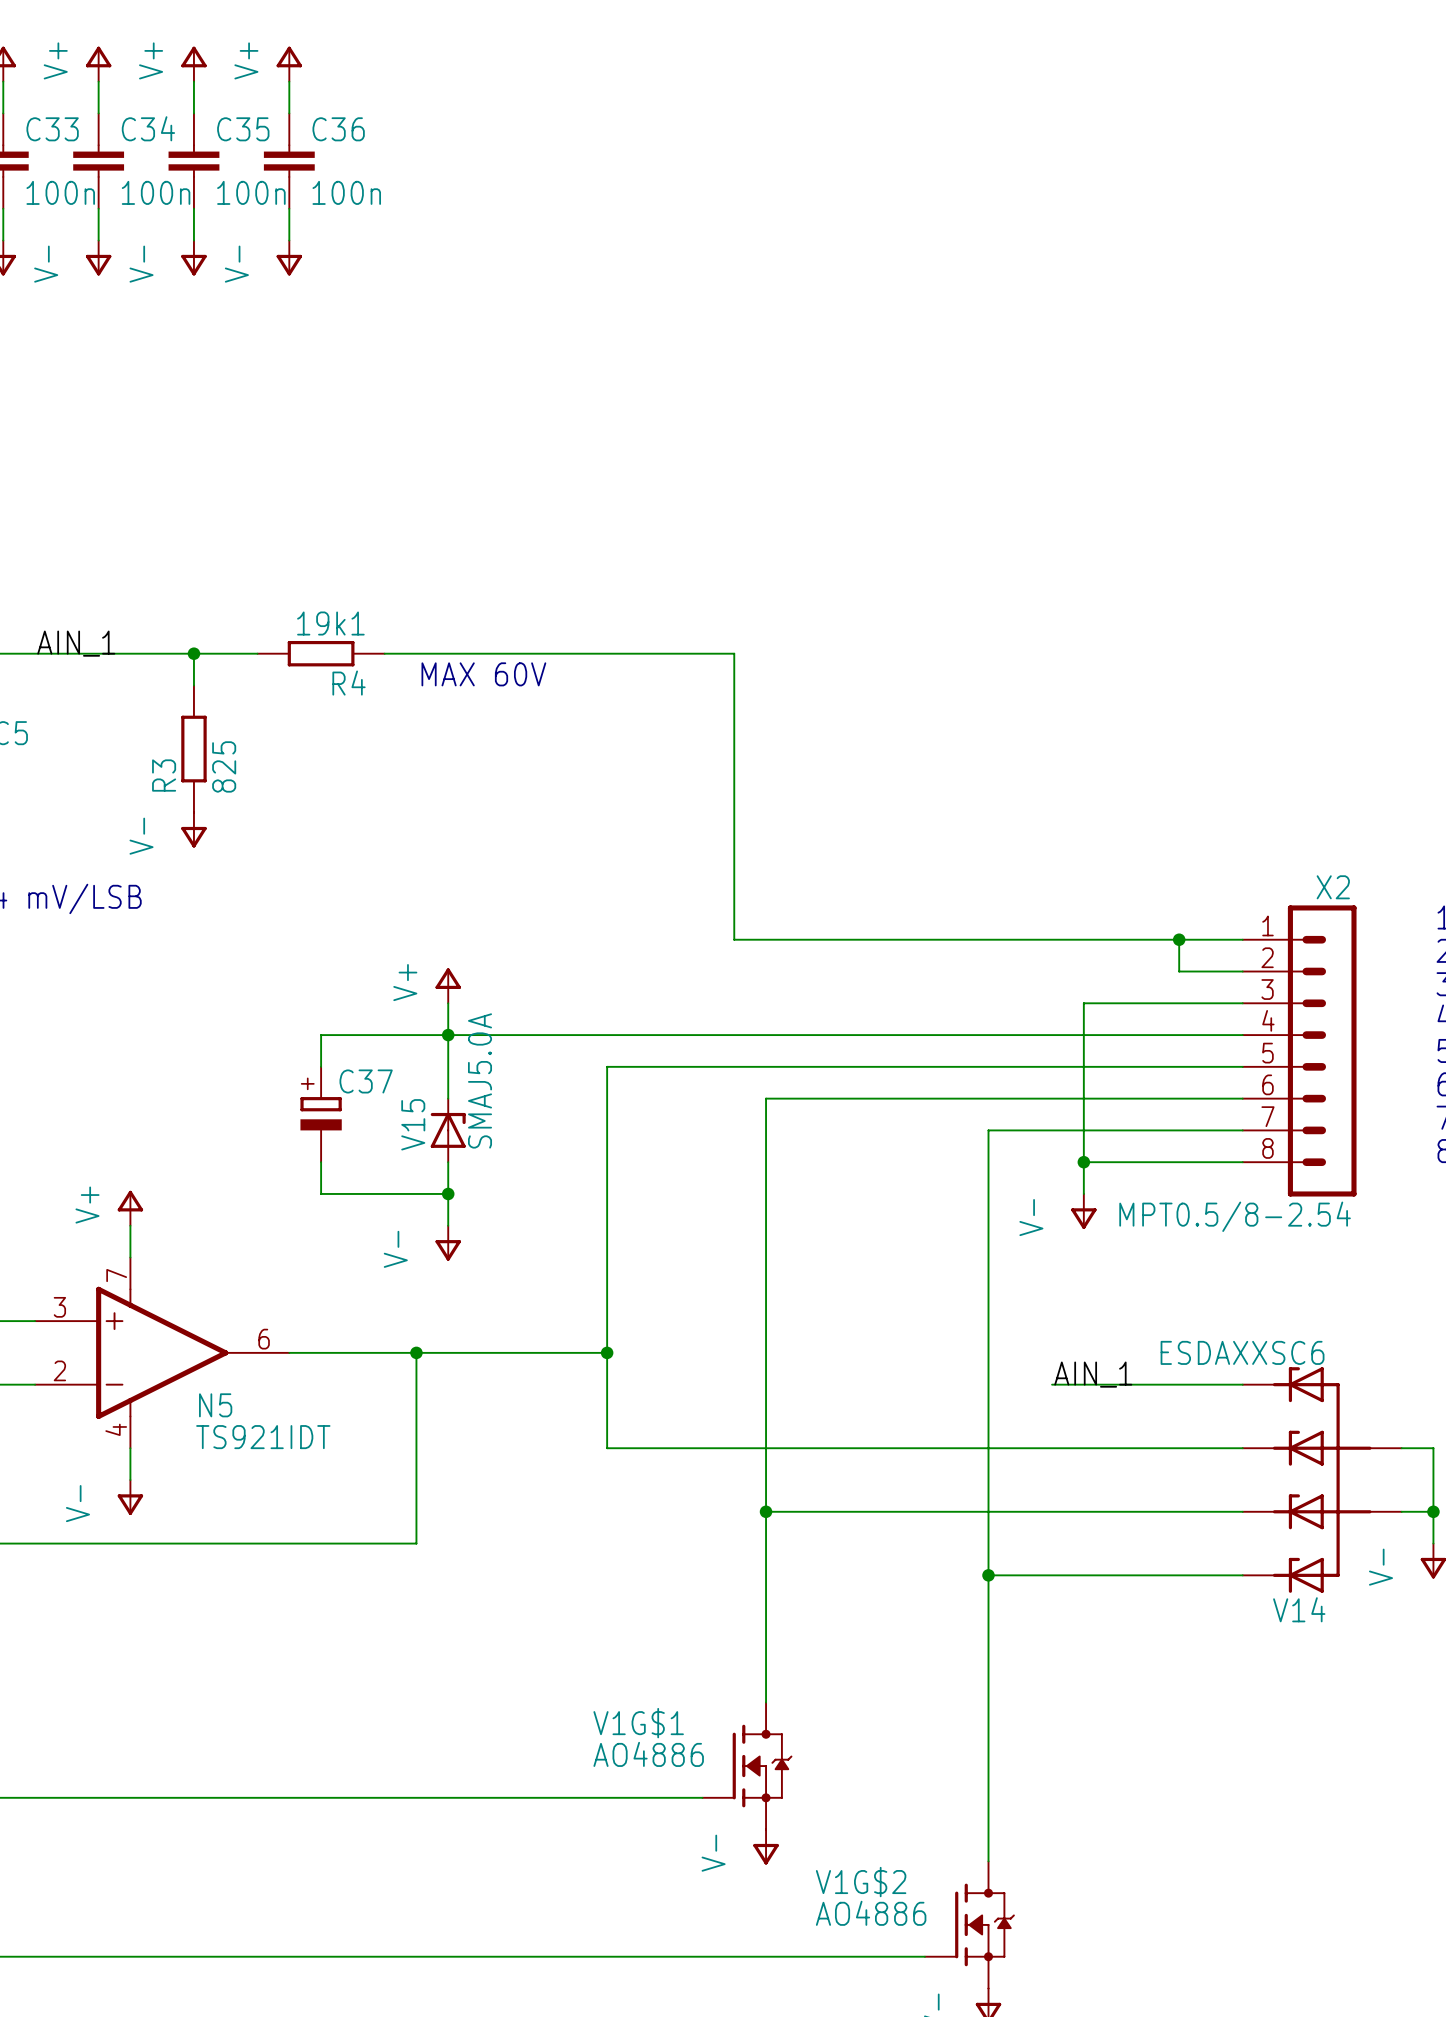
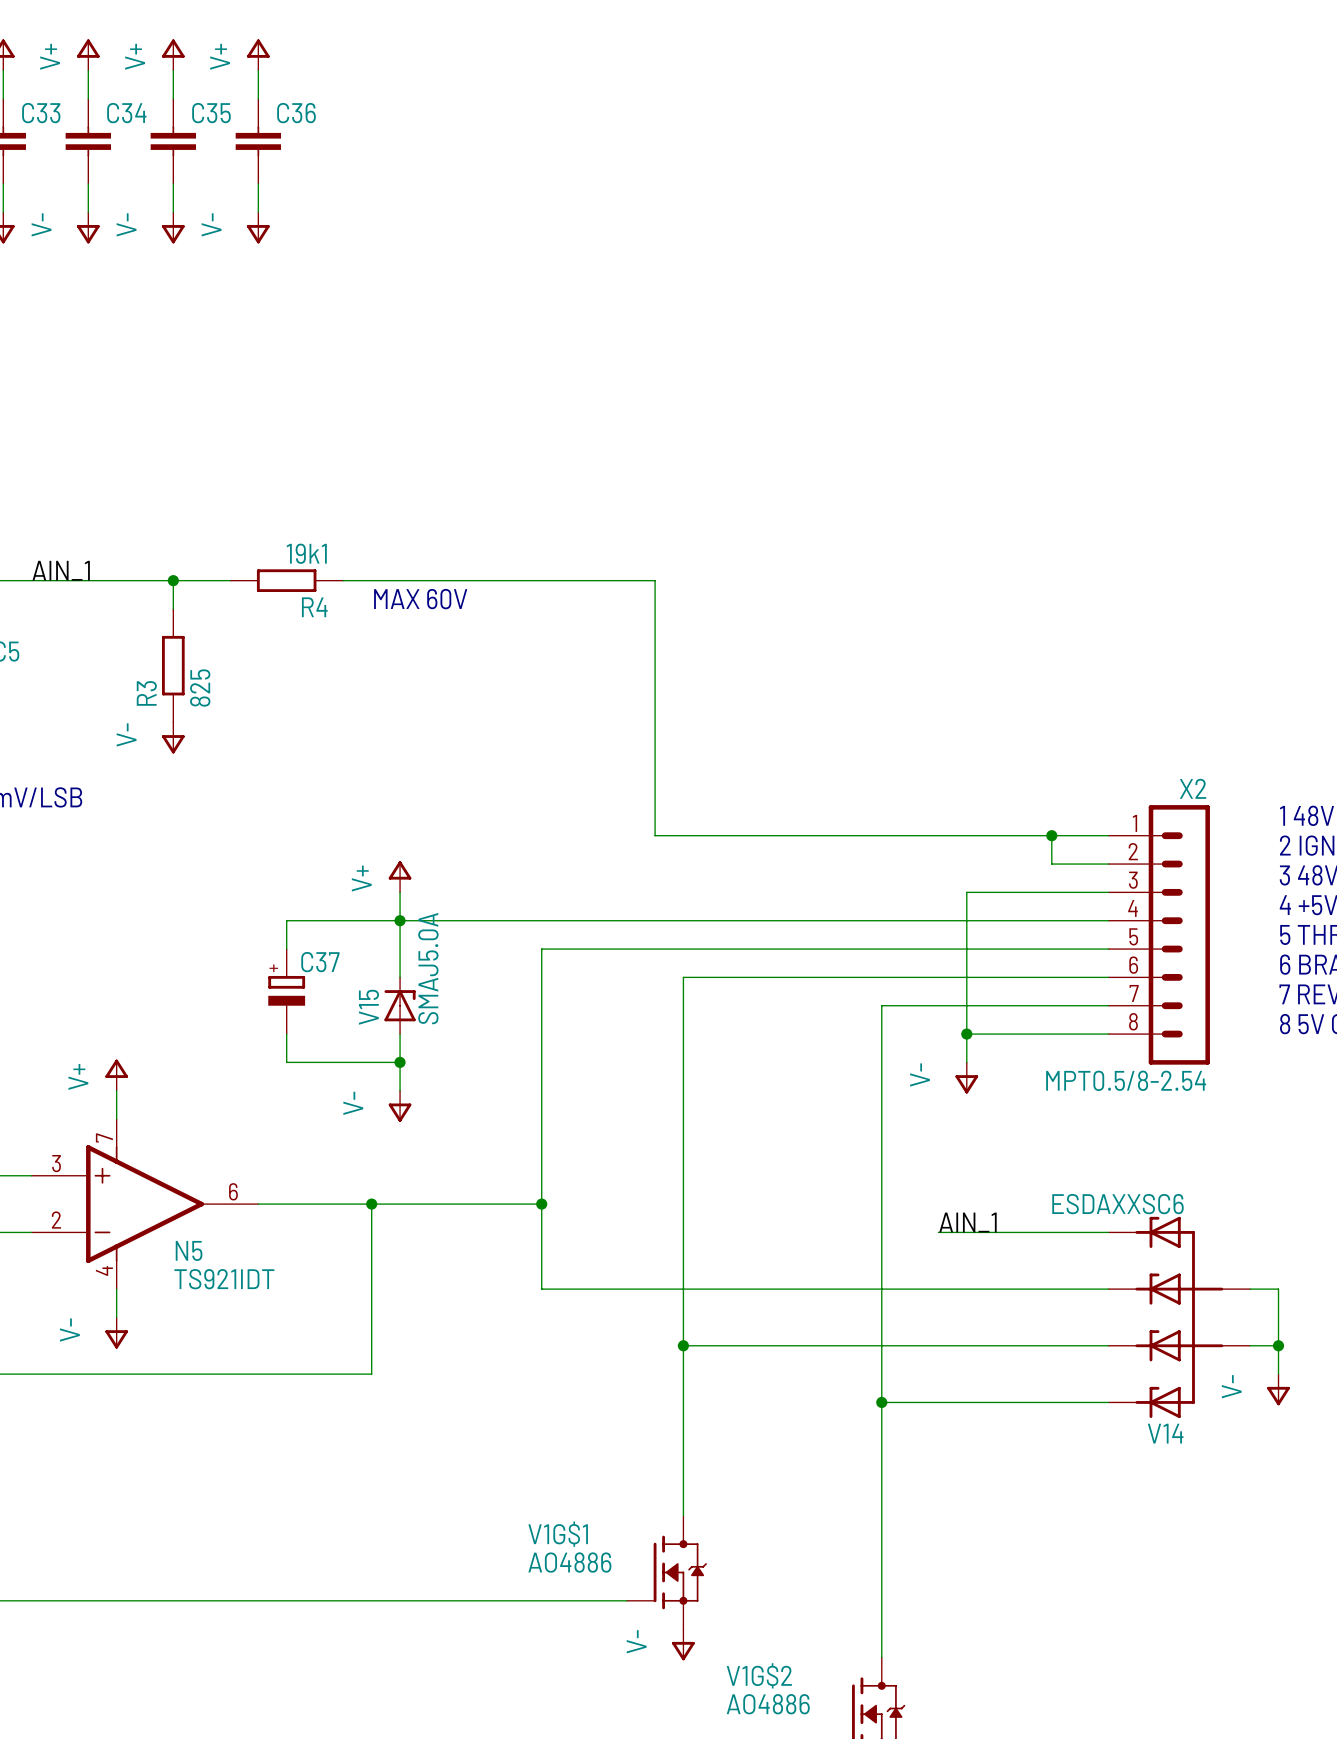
C33 value: 100n (60, 192) -> none
C34 value: 100n (156, 192) -> none
C35 value: 100n (251, 192) -> none
C36 value: 100n (346, 192) -> none

